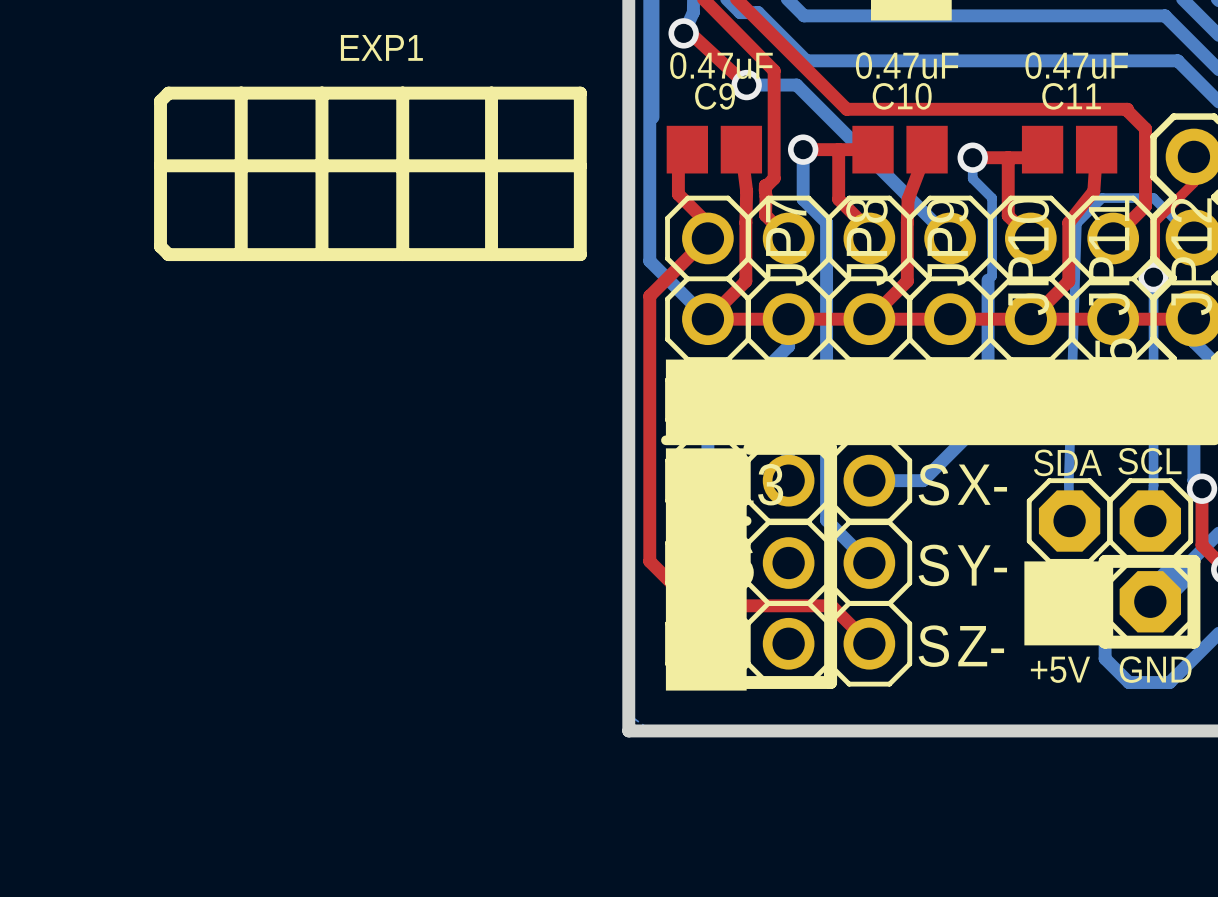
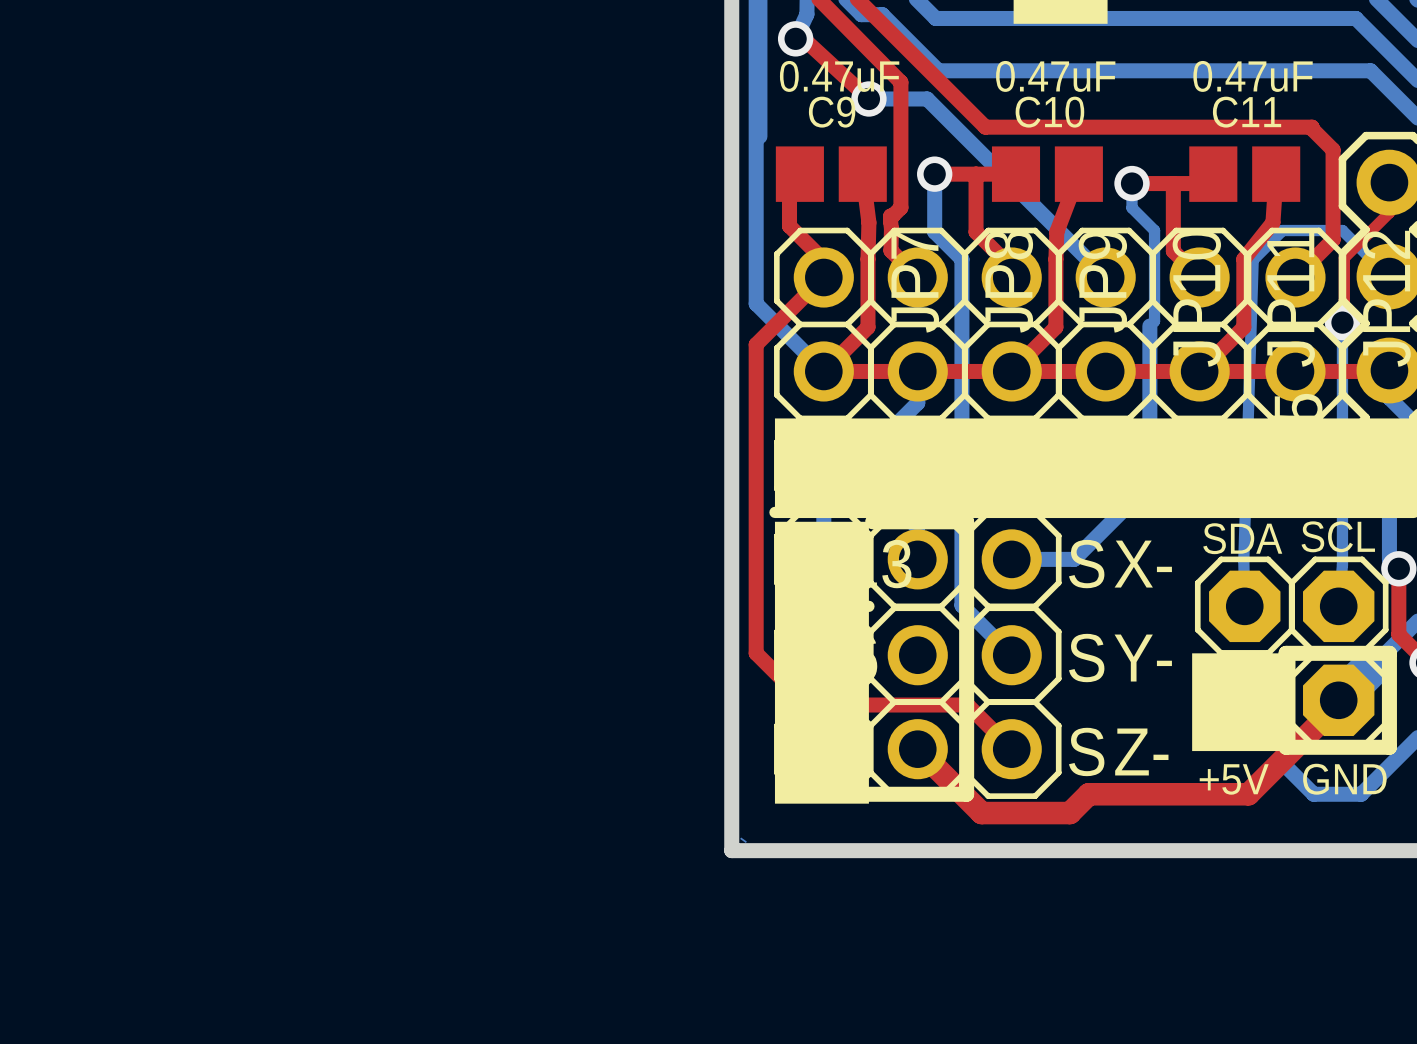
text: EXP1 (381, 47) -> none
line: (168, 93) (580, 93) (580, 254) (168, 254) (160, 246) (160, 101) (168, 93) -> none
line: (241, 93) (241, 254) -> none
line: (321, 93) (321, 254) -> none
line: (402, 93) (402, 254) -> none
line: (491, 93) (491, 254) -> none
line: (160, 165) (580, 165) -> none
top track: none -> (1338, 700) (1338, 704) (1248, 794) (1088, 794) (1069, 813) (981, 813) (917, 749)

